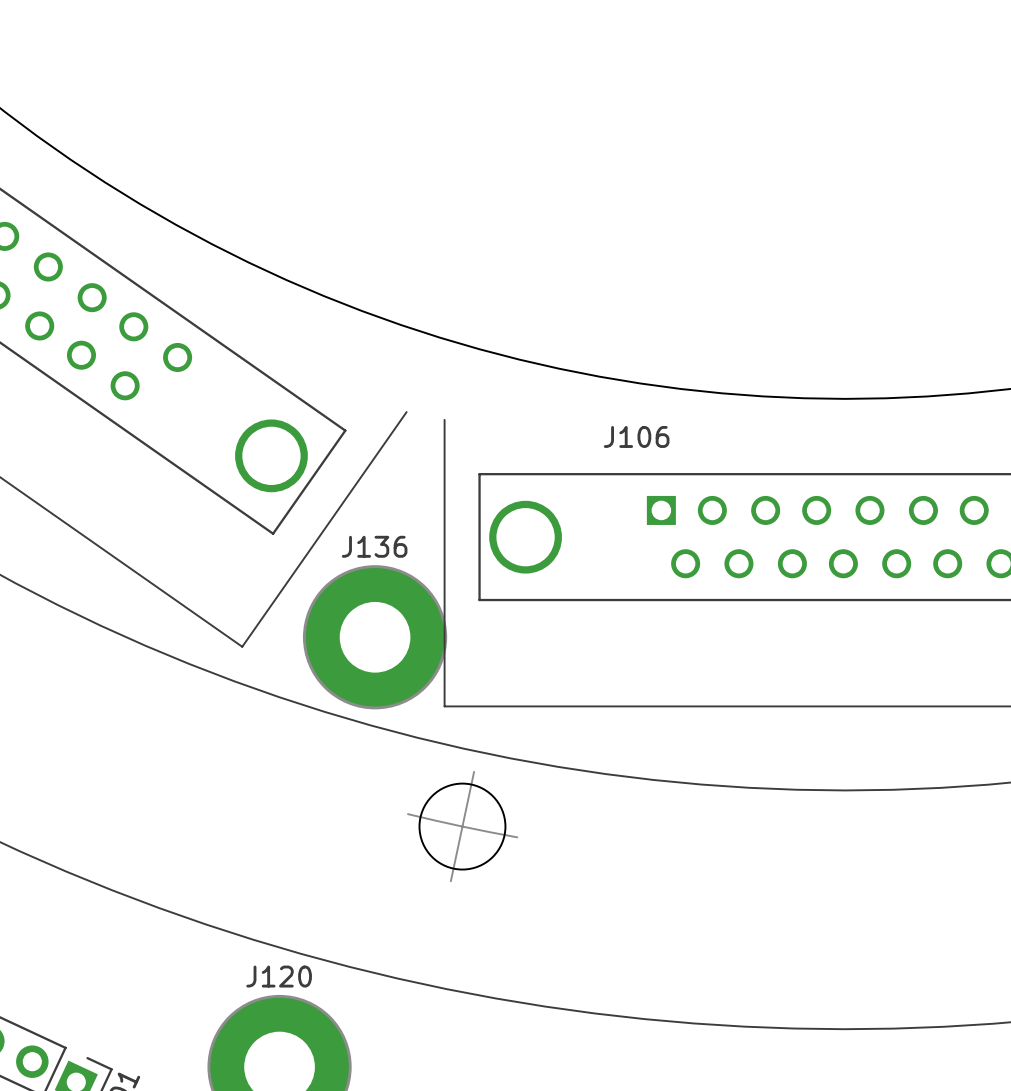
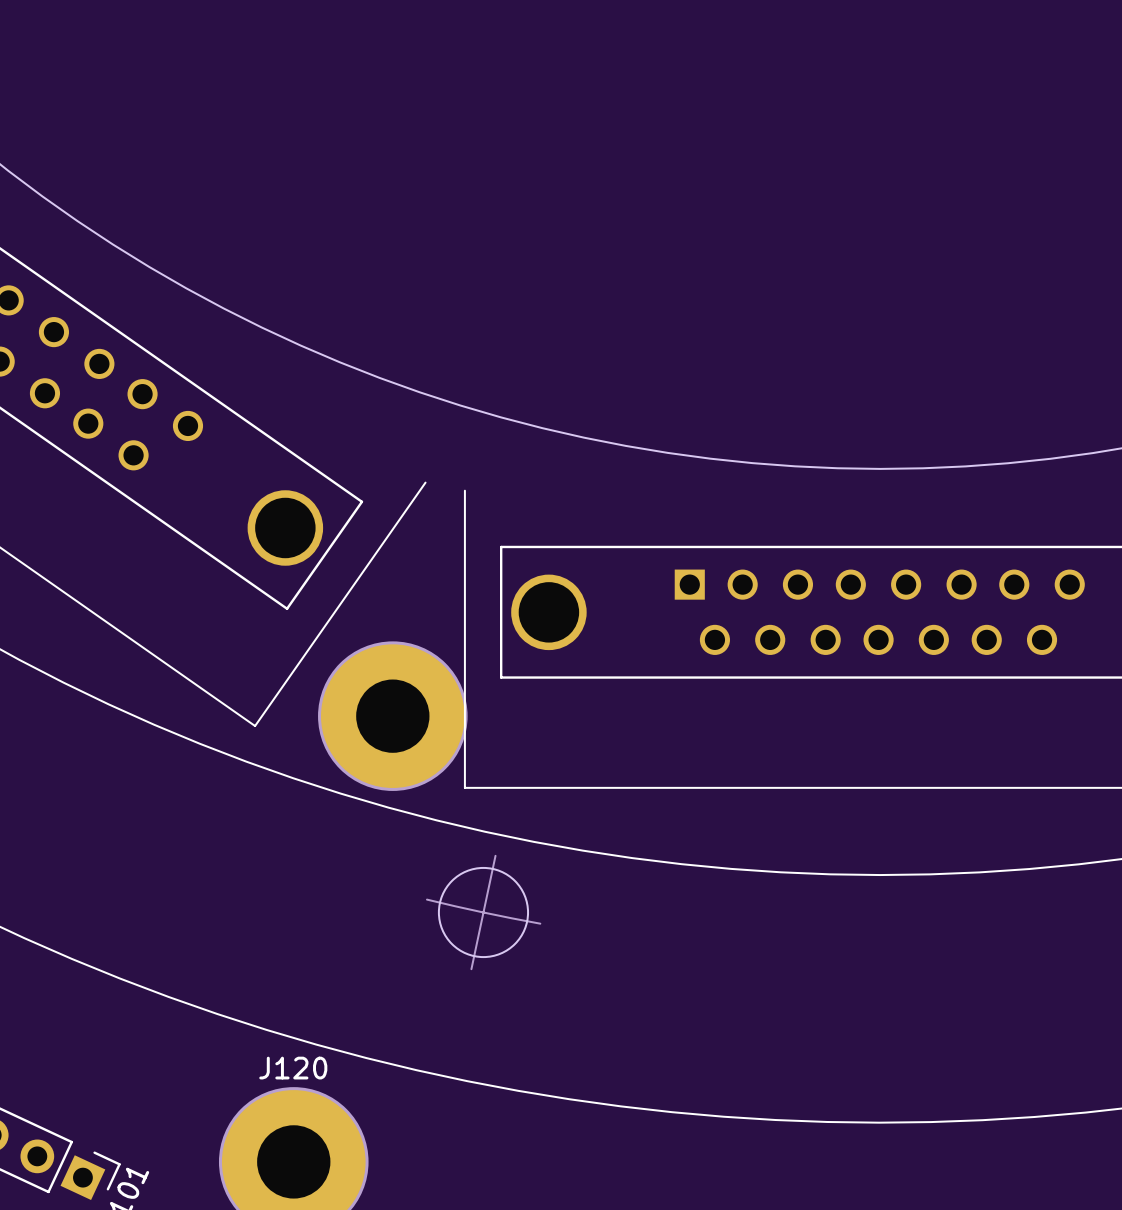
J106 name: J106 (636, 436) -> none
J136 name: J136 (374, 546) -> none

